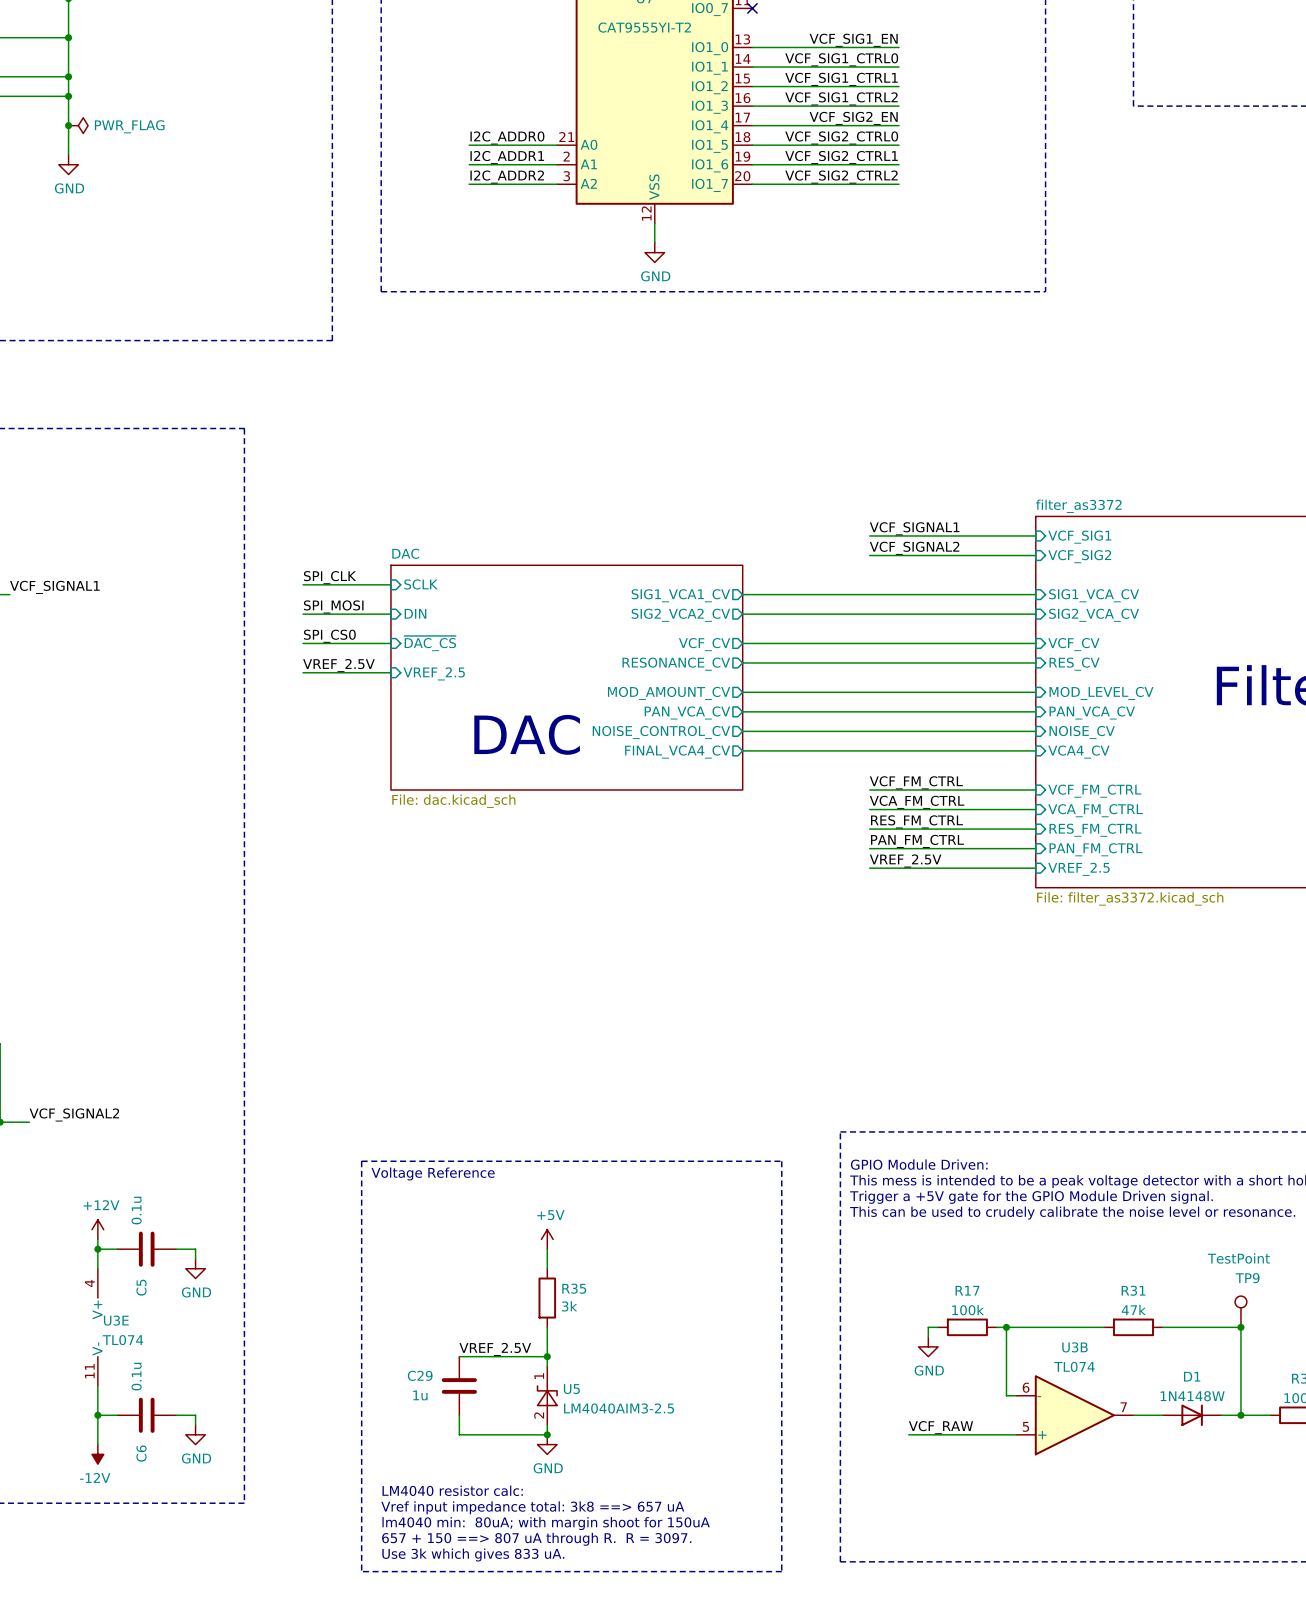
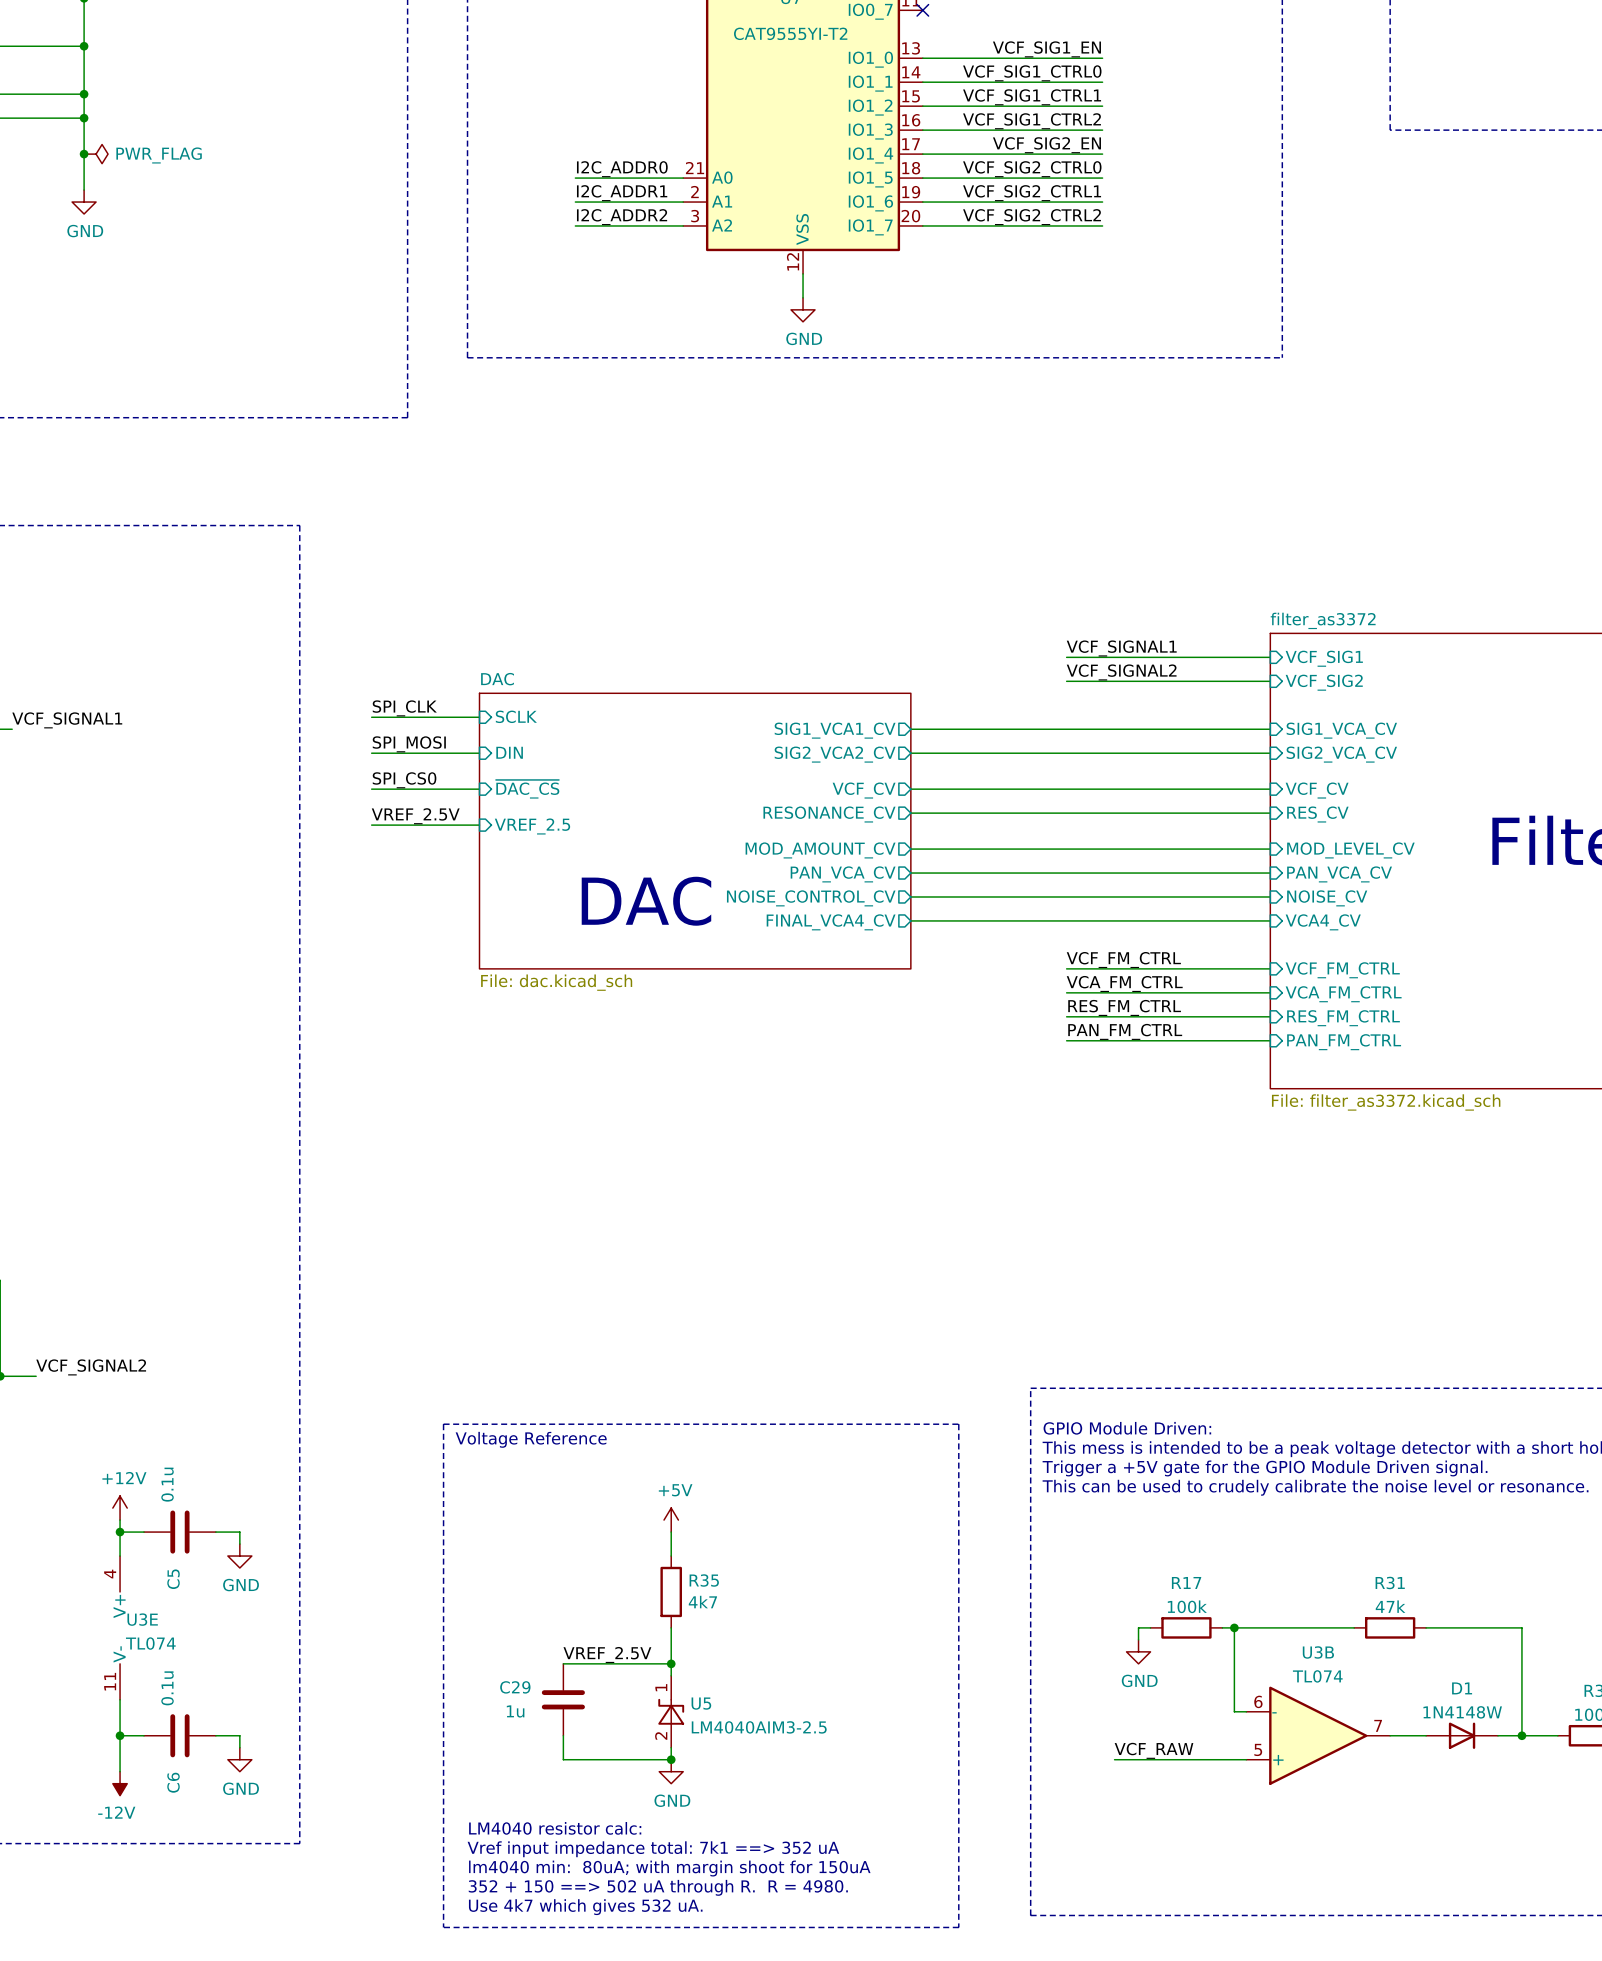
label: VREF_2.5V (905, 860) -> none
wire: (869, 868) (1035, 868) -> none
sheet pin: VREF_2.5 (1079, 869) -> none
R35 value: 3k (569, 1306) -> 4k7 (702, 1602)
TP9: TestPoint (1240, 1311) -> none
junction: (1240, 1327) -> none
text: Vref input impedance total: 3k8 ==> 657 uA (532, 1507) -> Vref input impedance total: 7k1 ==> 352 uA (653, 1849)
text: 657 + 150 ==> 807 uA through R. R = 3097. (536, 1539) -> 352 + 150 ==> 502 uA through R. R = 4980. (658, 1887)
text: Use 3k which gives 833 uA. (473, 1555) -> Use 4k7 which gives 532 uA. (585, 1907)

